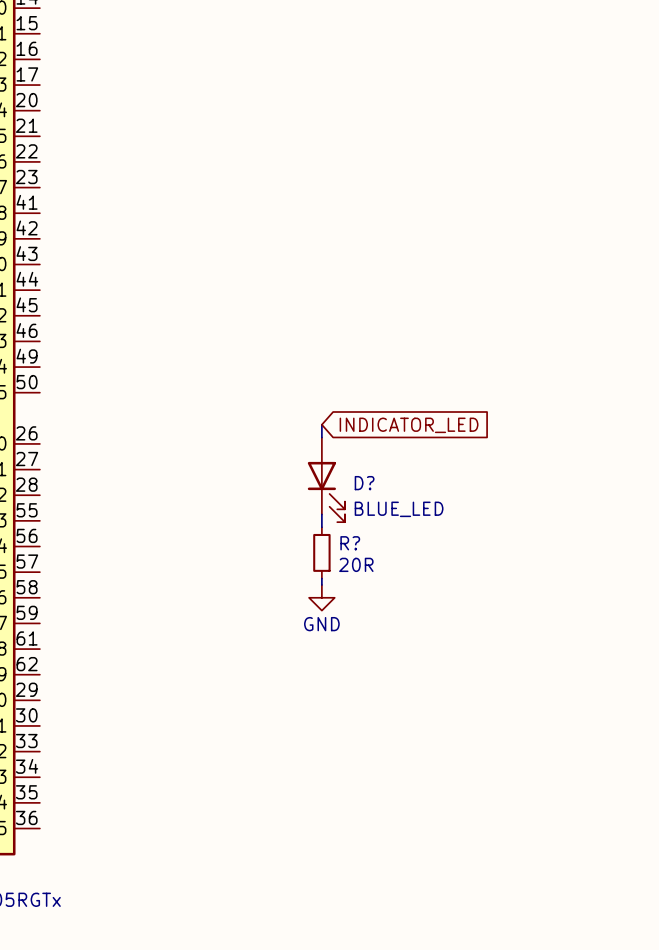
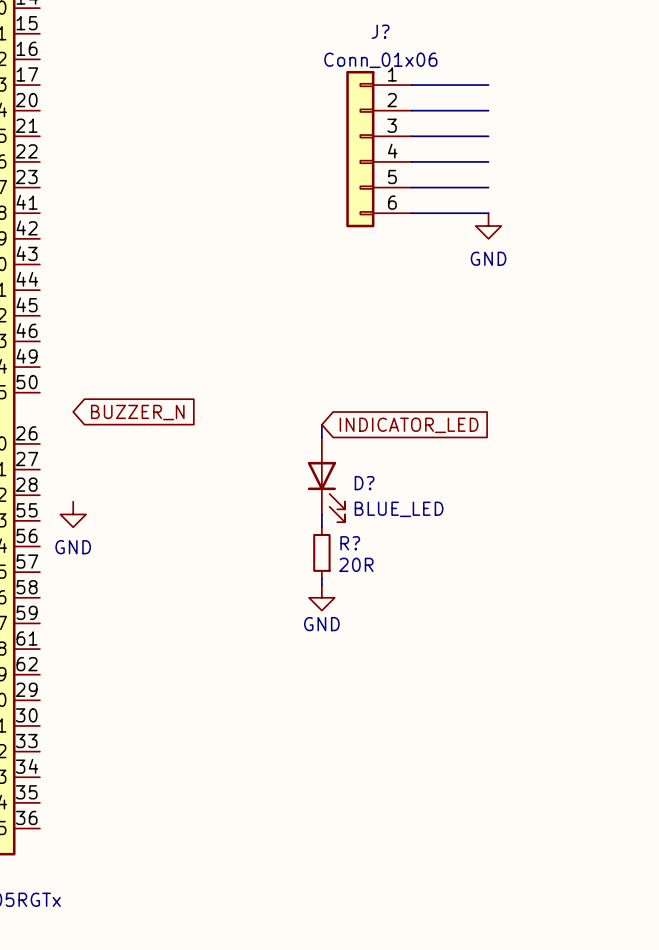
wire: none -> (411, 85) (488, 85)
wire: none -> (411, 110) (488, 110)
wire: none -> (411, 136) (488, 136)
J?: none -> Conn_01x06 (378, 149)
wire: none -> (411, 161) (488, 161)
wire: none -> (411, 187) (488, 187)
wire: none -> (411, 213) (488, 213)
power symbol: none -> GND (488, 226)
global label: none -> BUZZER_N (137, 412)
power symbol: none -> GND (73, 514)

